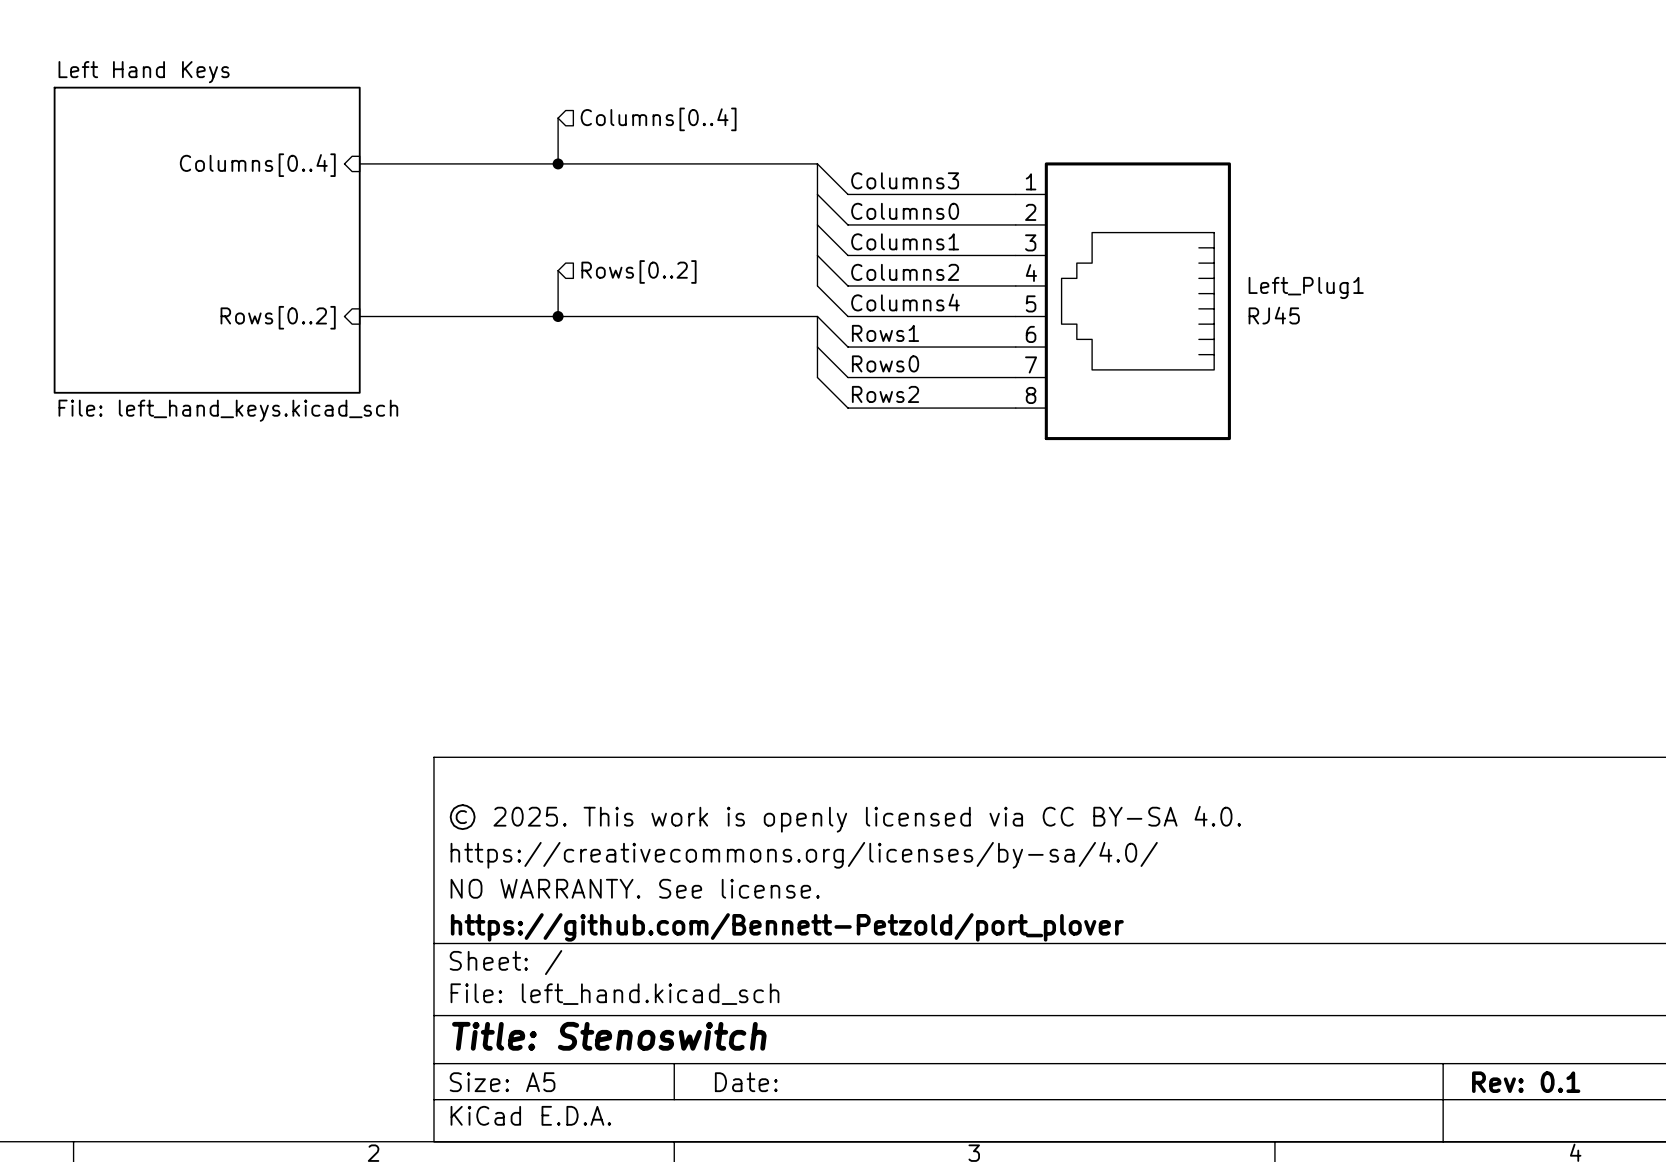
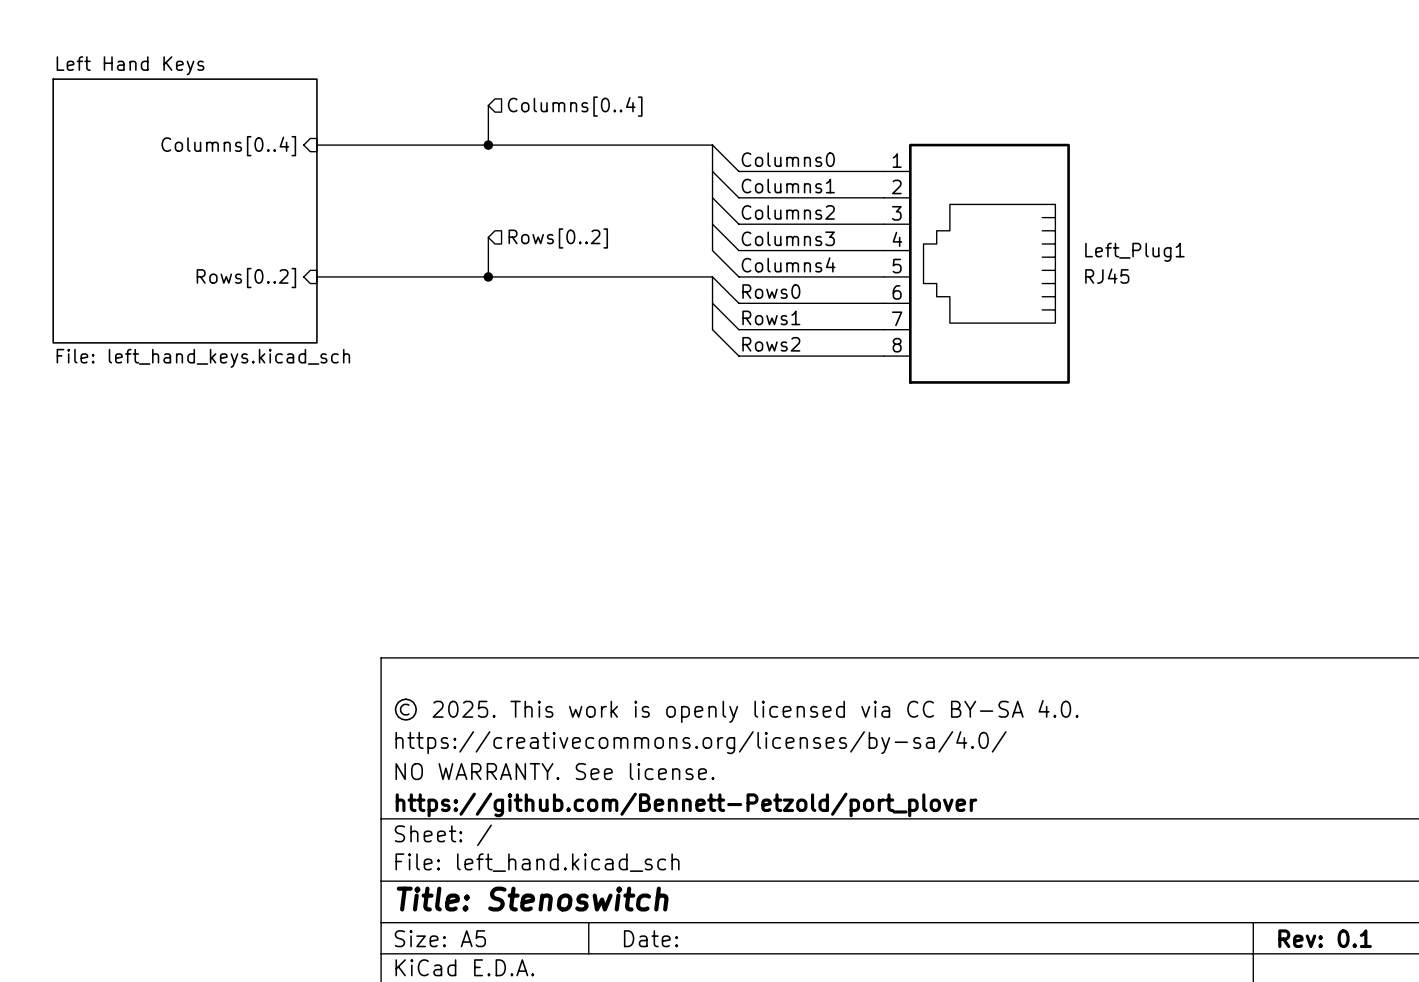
label: Columns3 (905, 180) -> Columns0 (788, 159)
label: Columns0 (905, 211) -> Columns1 (788, 186)
label: Columns1 (905, 241) -> Columns2 (788, 212)
label: Columns2 (905, 272) -> Columns3 (788, 238)
label: Rows1 (885, 333) -> Rows0 (771, 291)
label: Rows0 (885, 363) -> Rows1 (771, 317)

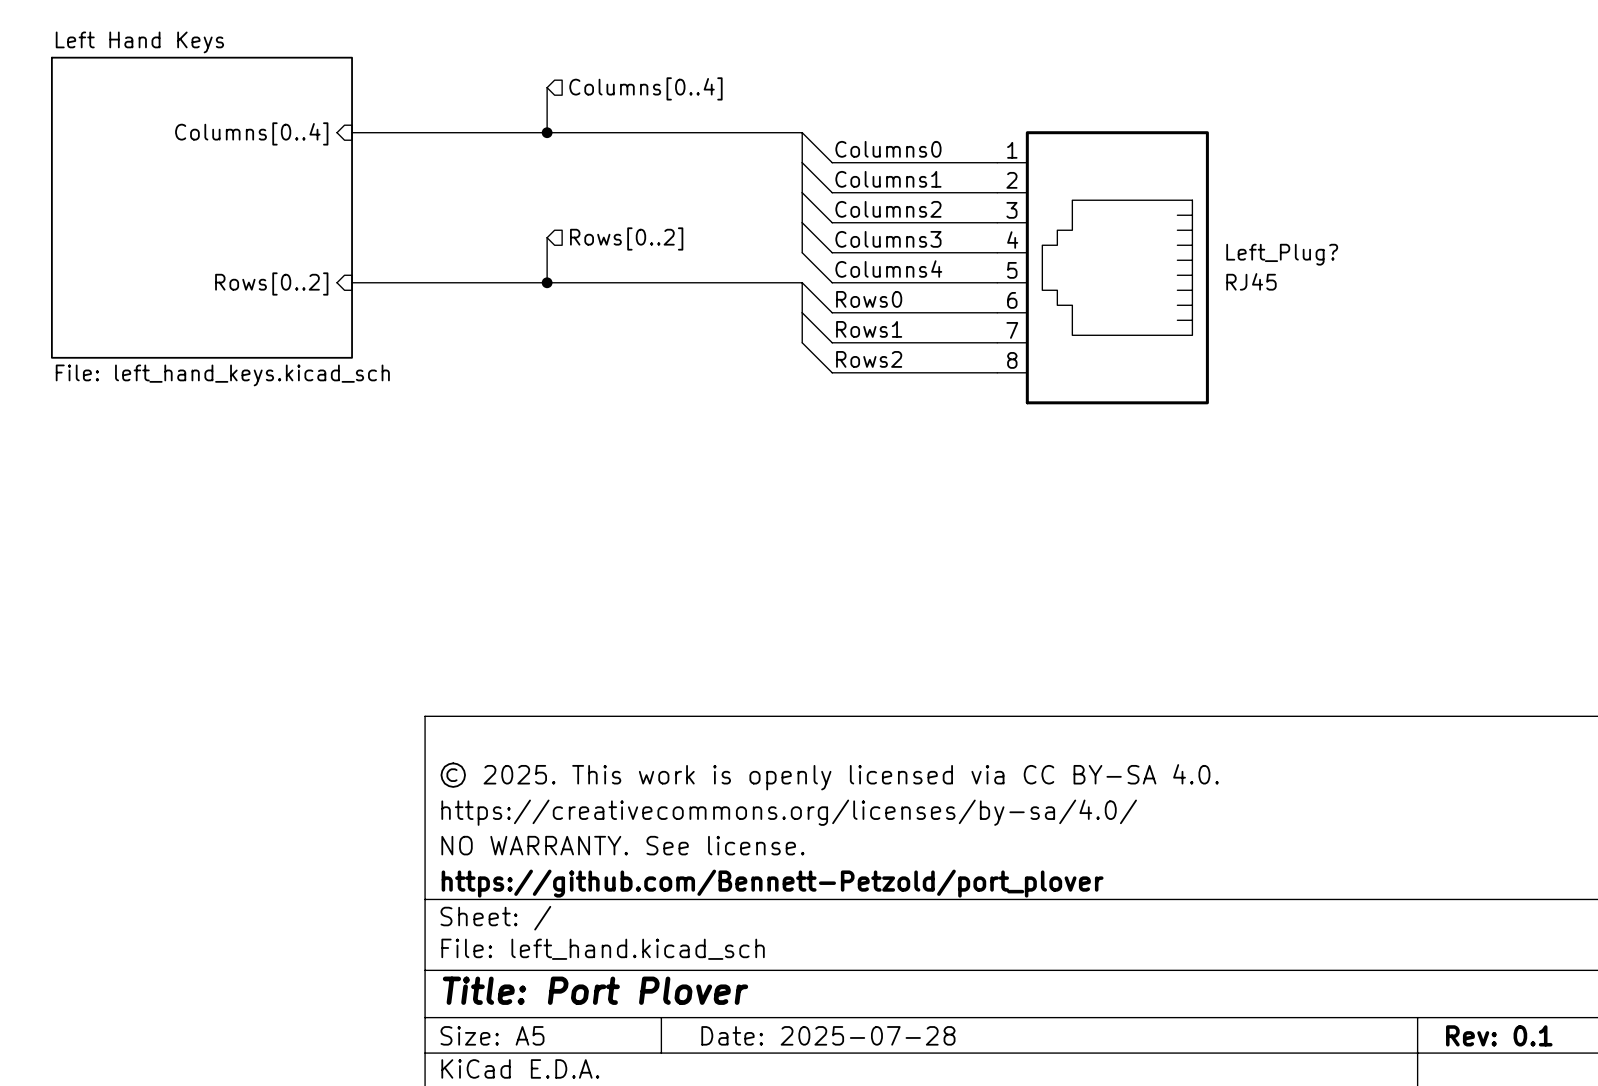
Left_Plug1 name: Left_Plug1 (1134, 252) -> Left_Plug? (1282, 254)
title block: Title: Stenoswitch (532, 899) -> Title: Port Plover (595, 990)
title block: Date: (650, 938) -> Date: 2025-07-28 (828, 1035)

